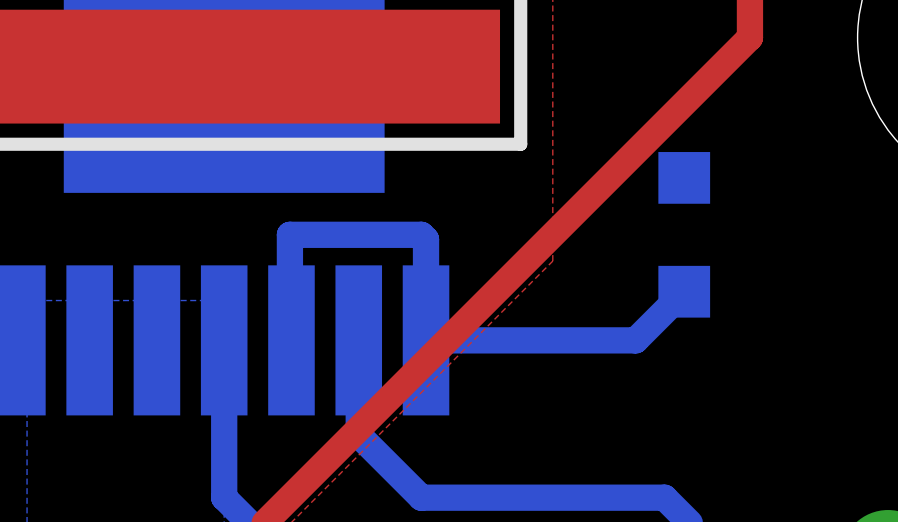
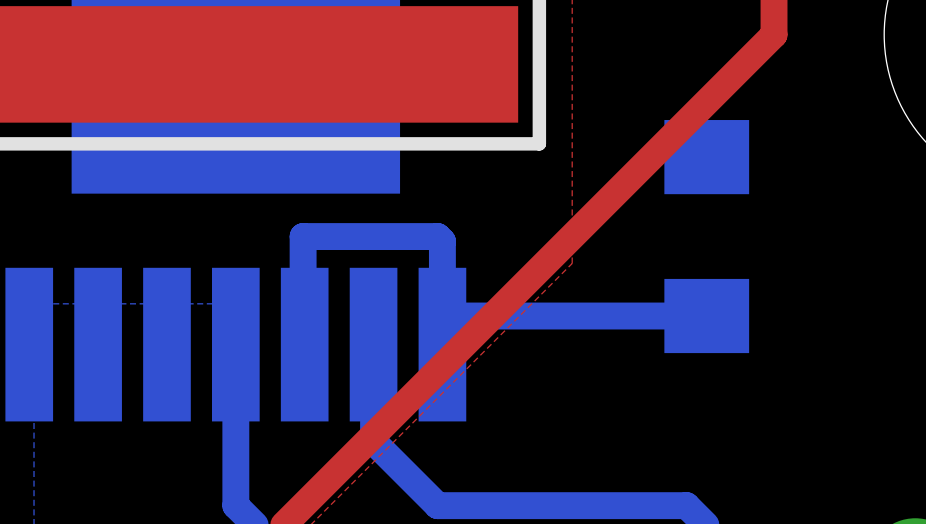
part footprint: [658, 152, 711, 318] -> [664, 120, 750, 354]
bottom track: (684, 291) (635, 340) (426, 340) -> none
bottom track: none -> (442, 316) (706, 316)

